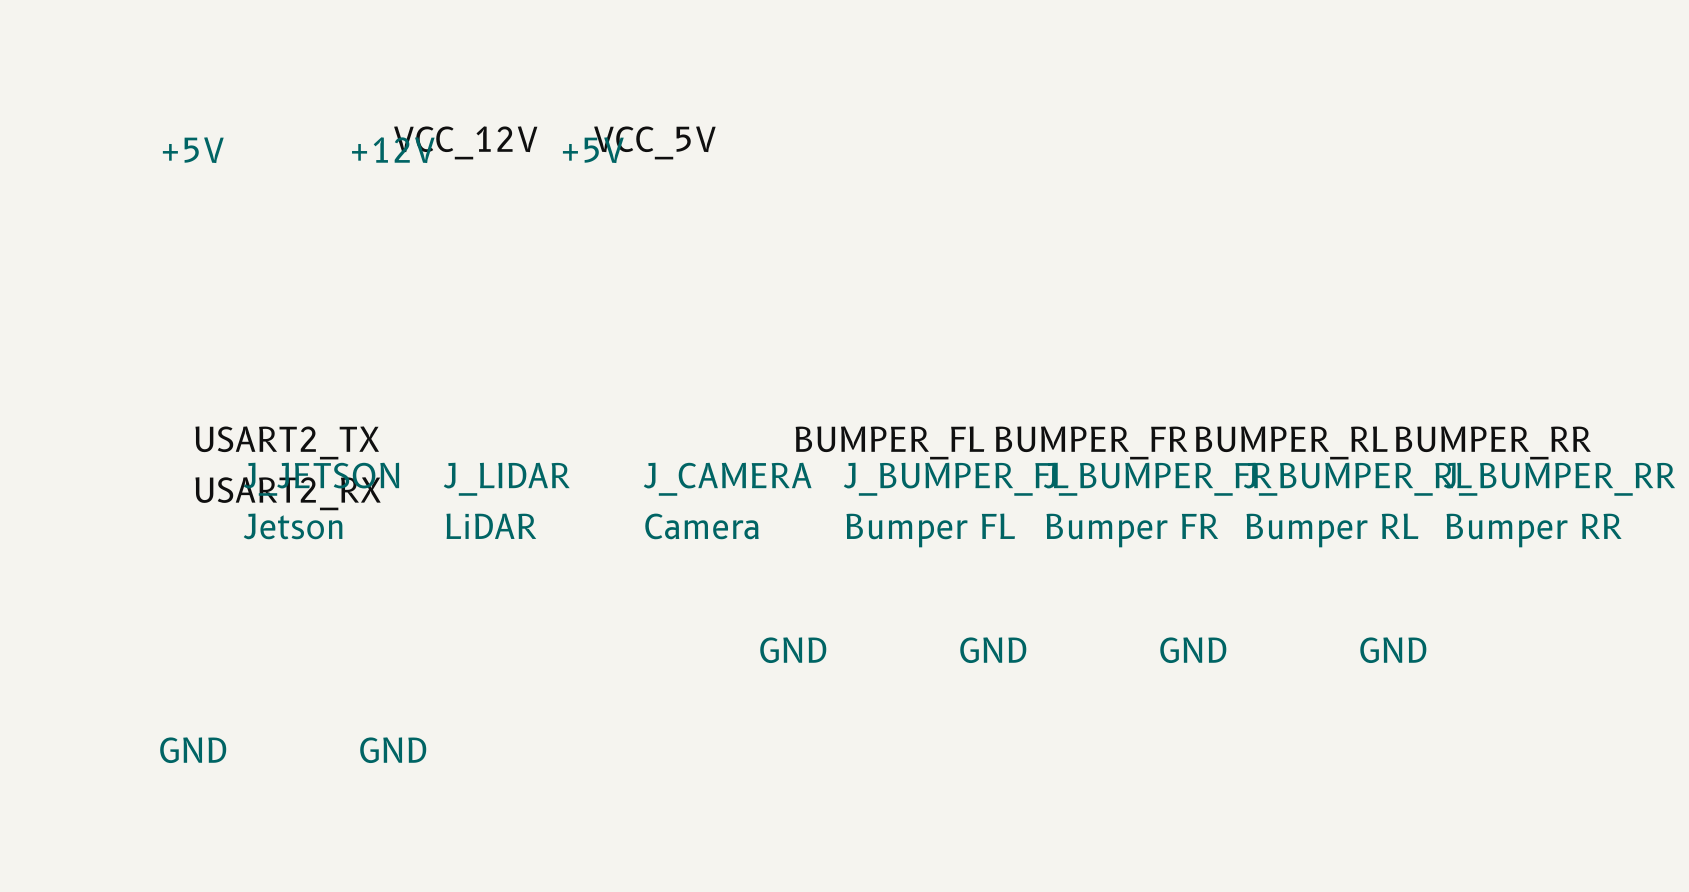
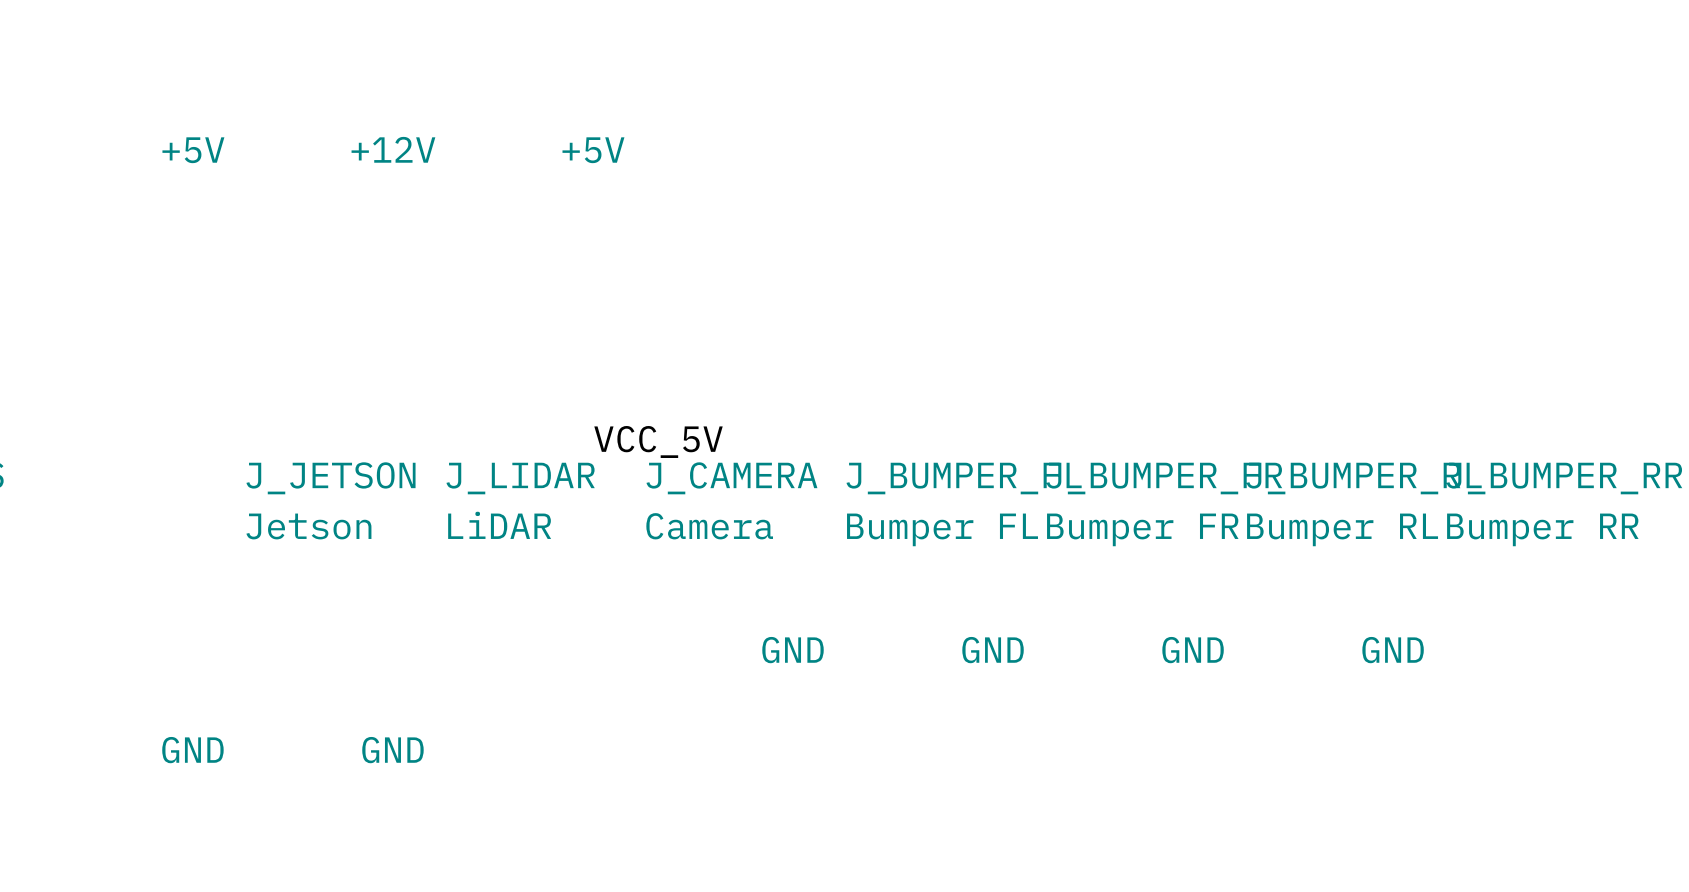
label: VCC_12V (465, 142) -> none
label position: VCC_5V (654, 142) -> VCC_5V (658, 441)
label: USART2_TX (287, 442) -> none
label: BUMPER_FL (889, 442) -> none
label: BUMPER_FR (1091, 442) -> none
label: BUMPER_RL (1291, 442) -> none
label: BUMPER_RR (1493, 442) -> none
label: USART2_RX (288, 493) -> none

